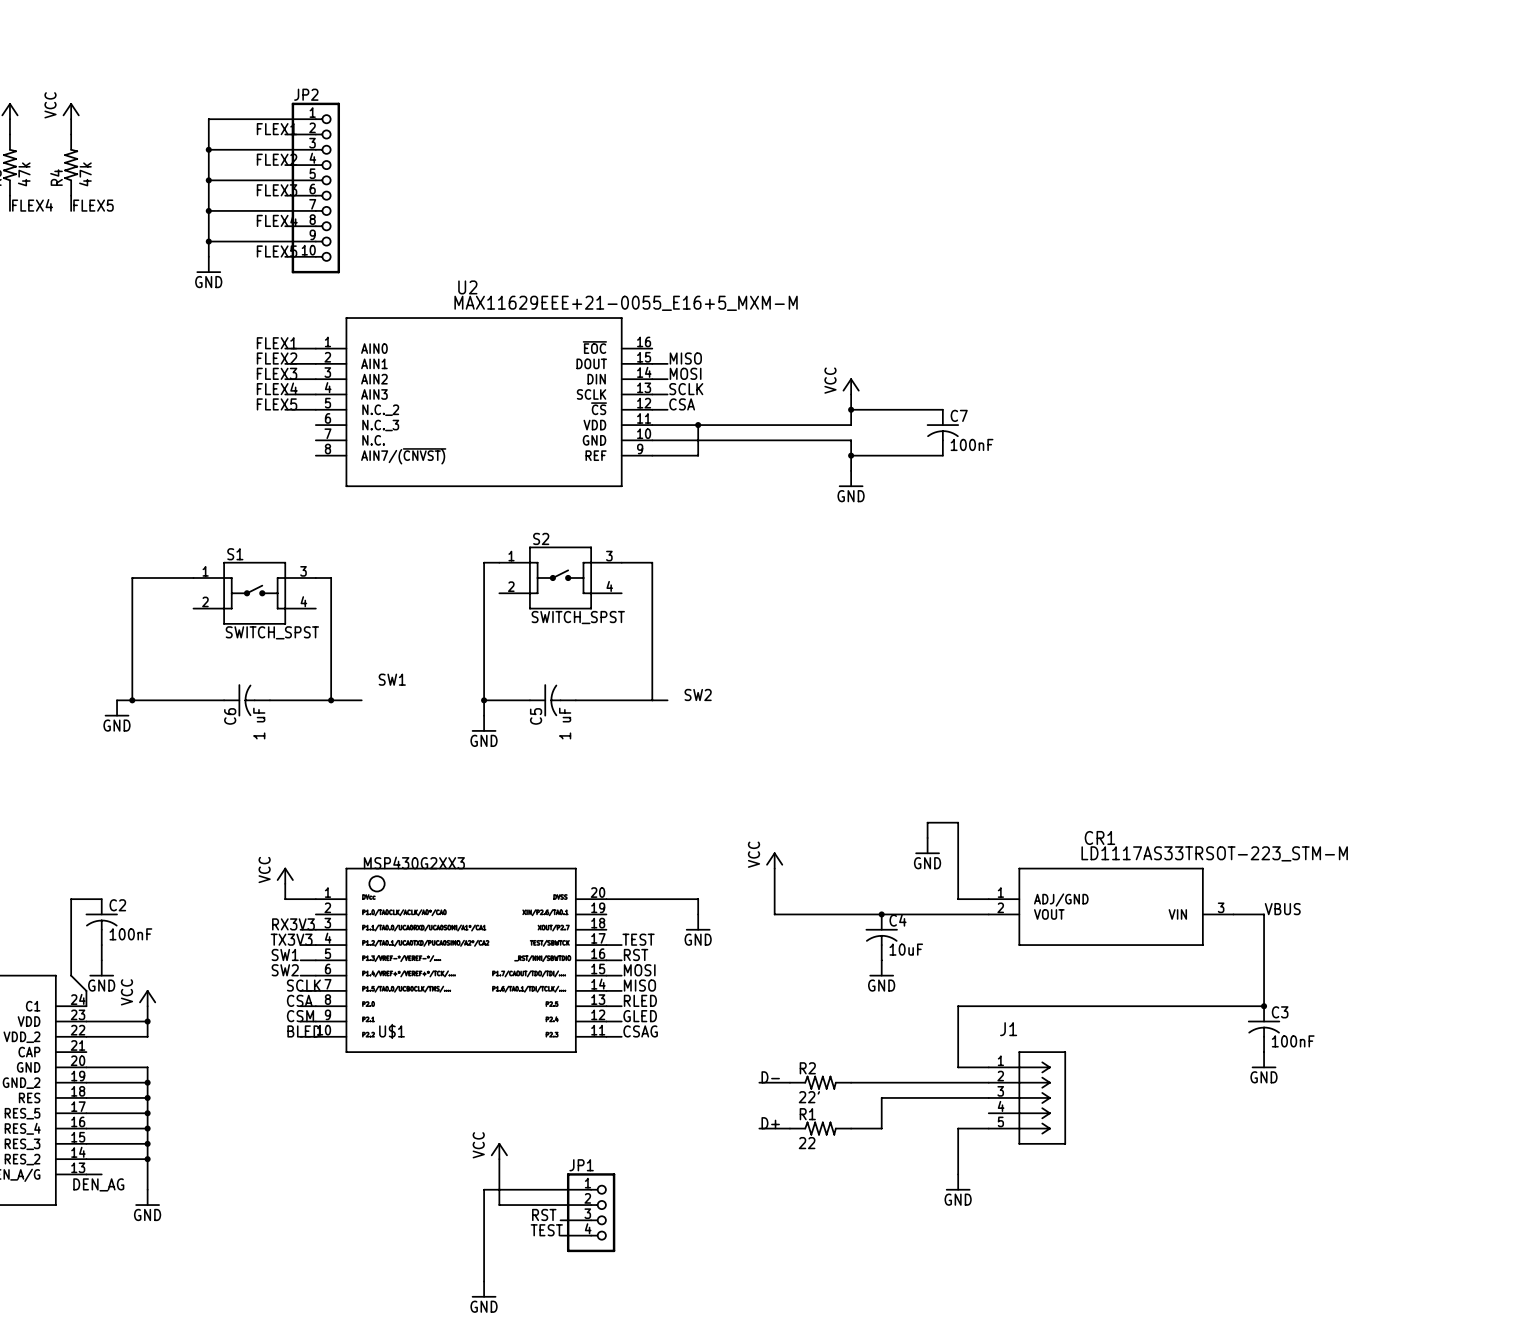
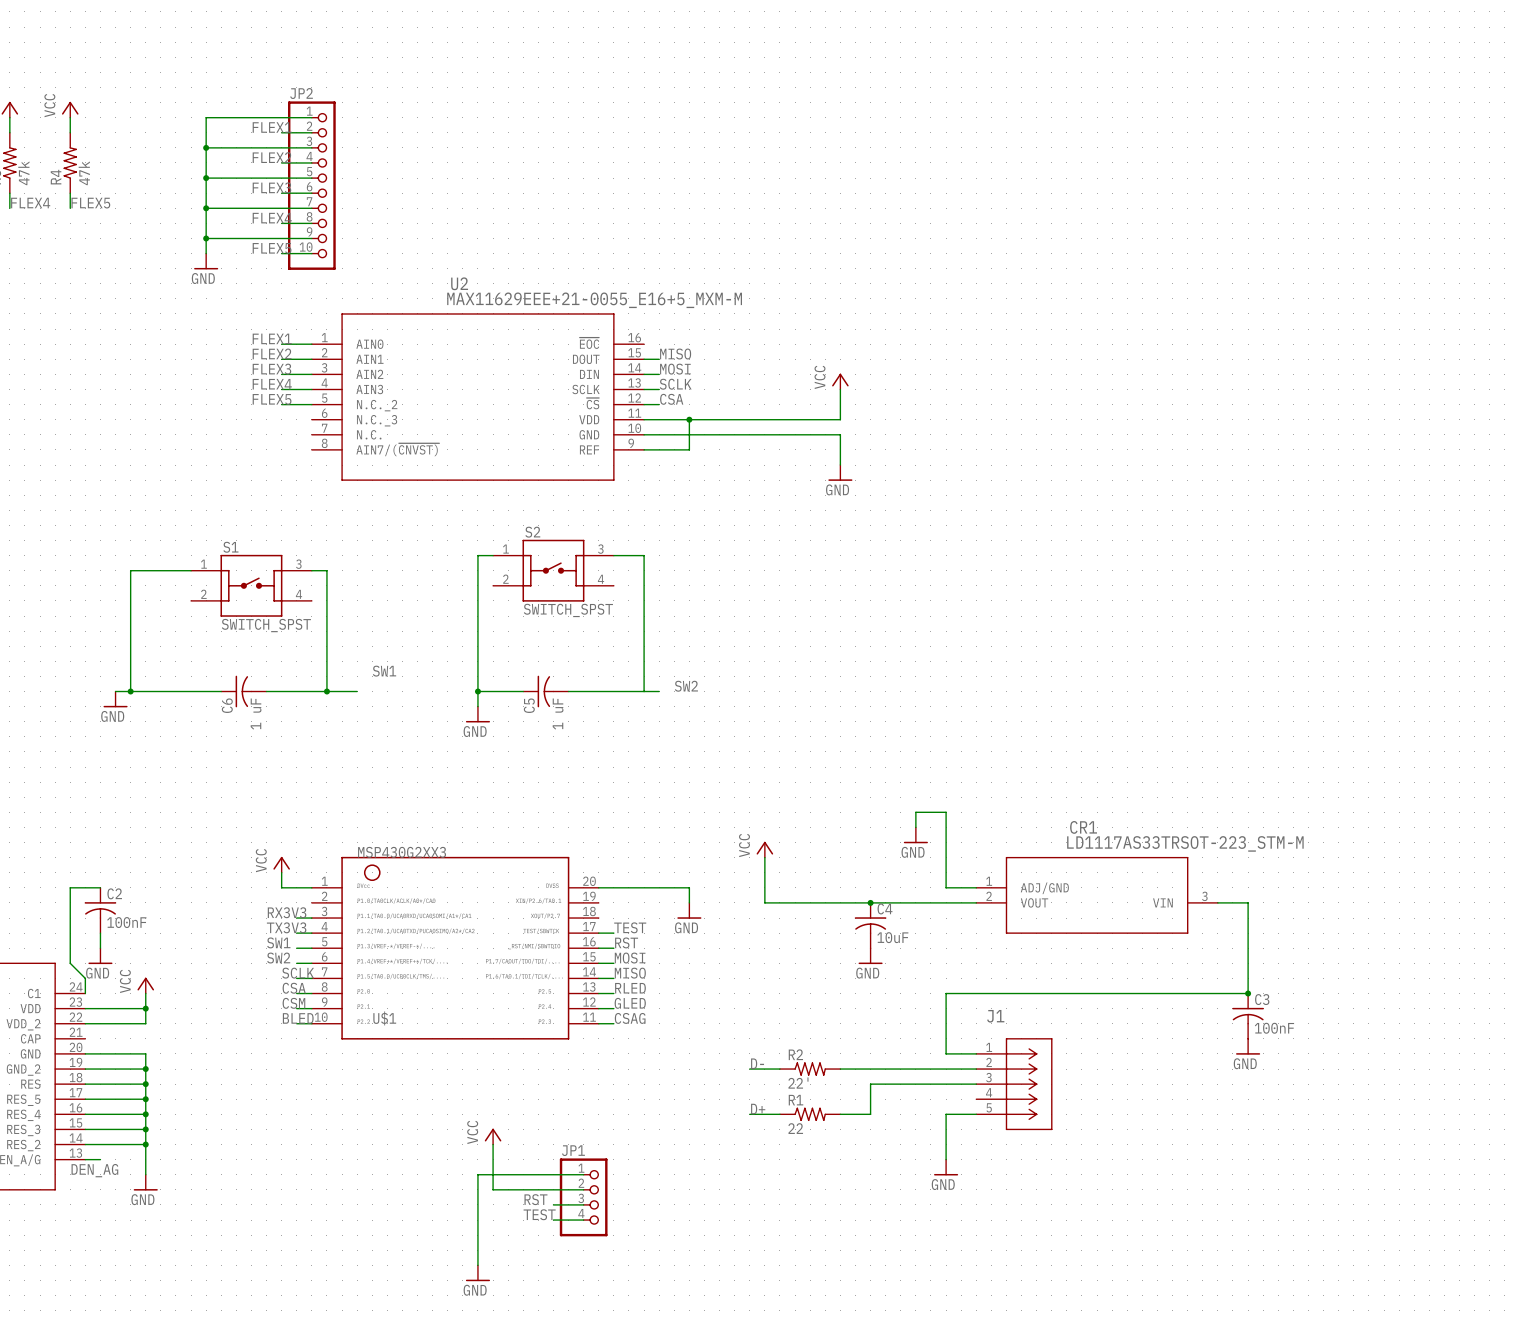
wire: (851, 409) (942, 409) -> none
junction: (851, 409) -> none
C7: 100nF (942, 432) -> none
wire: (851, 455) (942, 455) -> none
junction: (851, 455) -> none
label: VBUS (1282, 909) -> none

